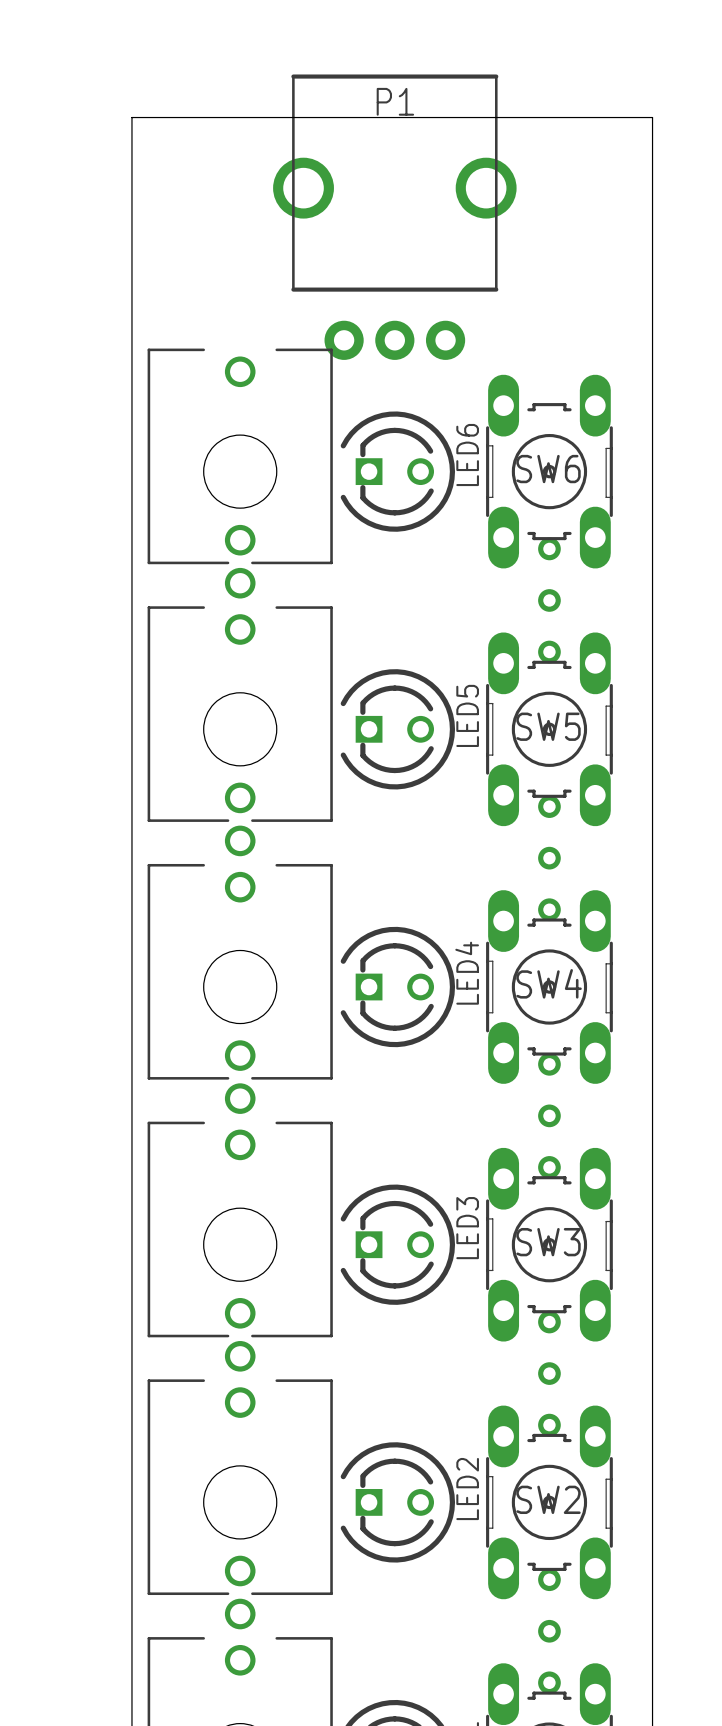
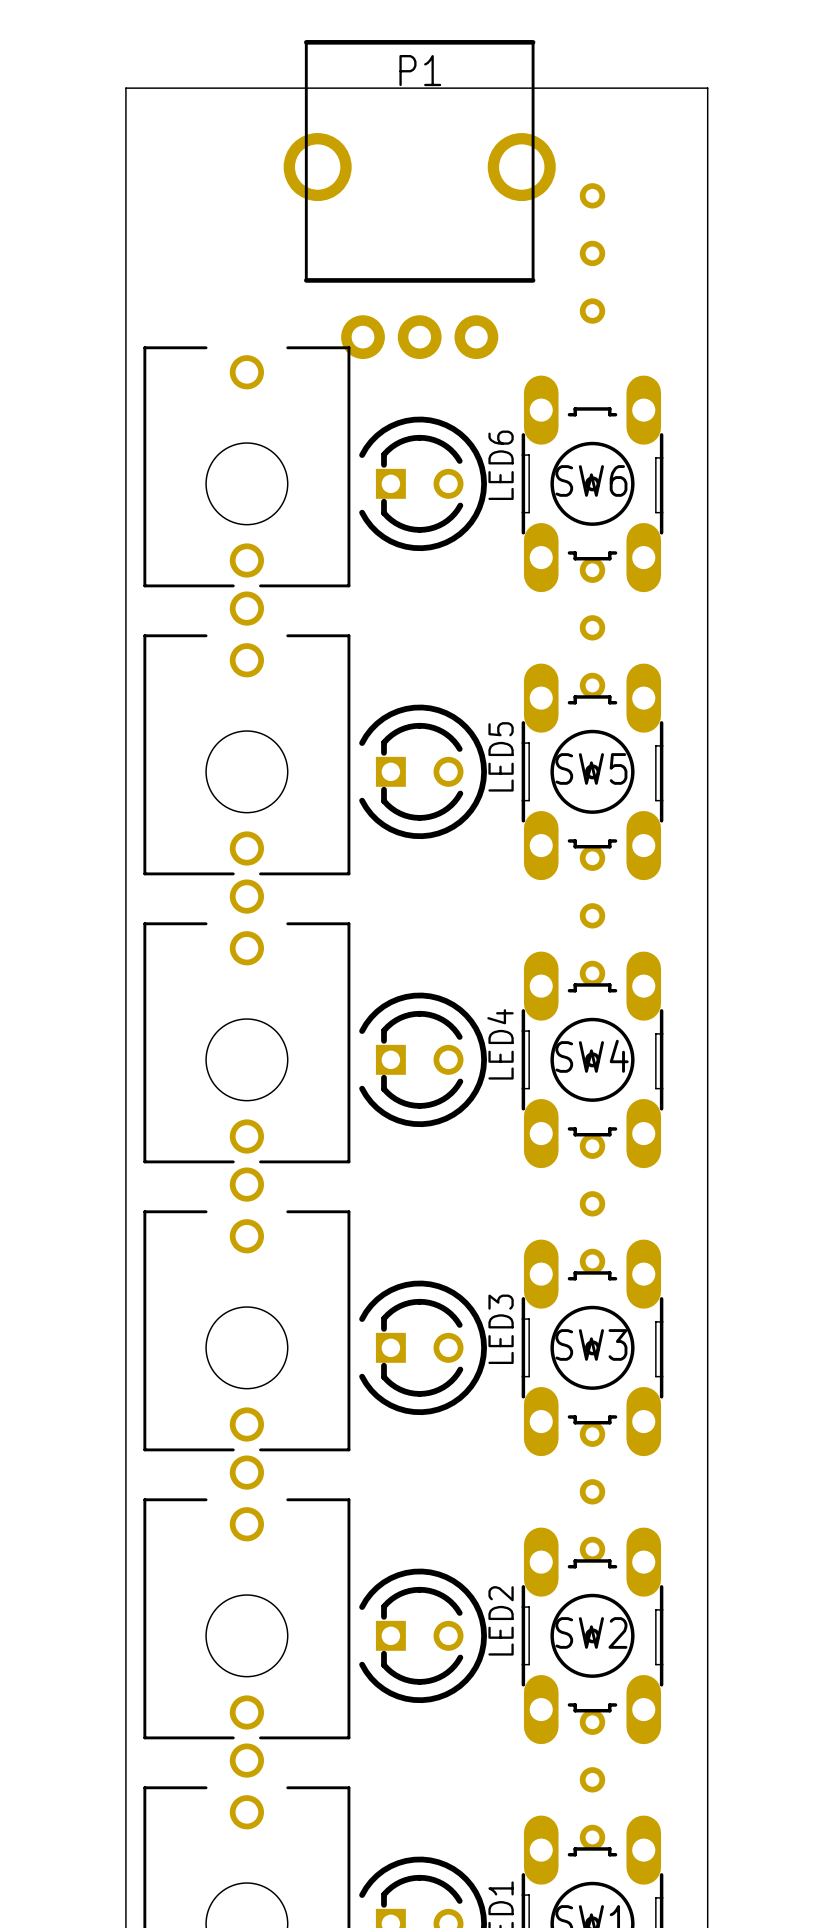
part: none -> (592, 253)

